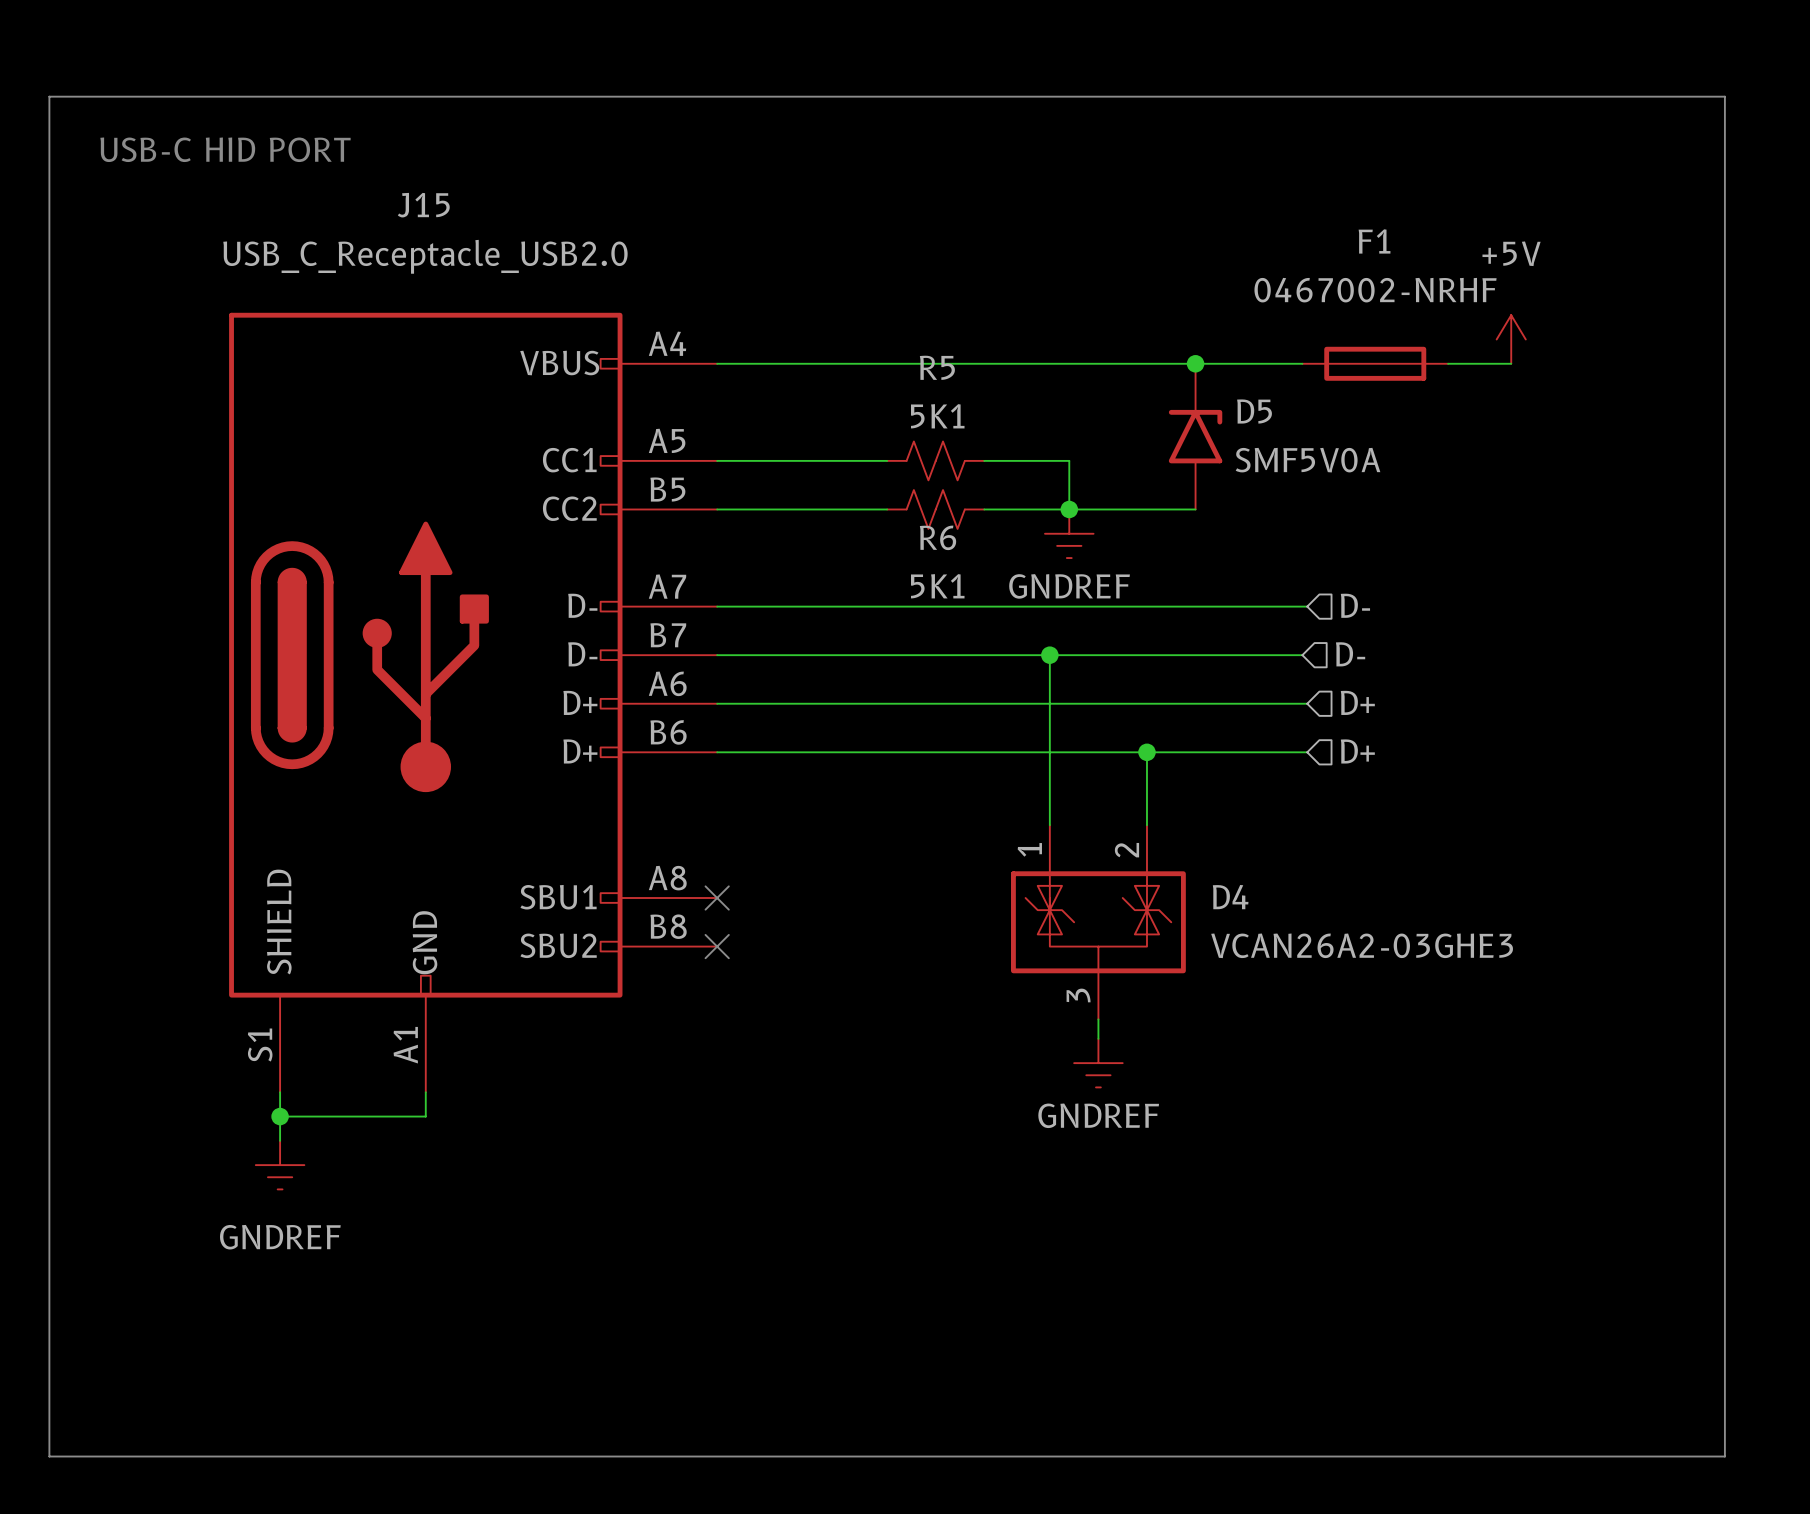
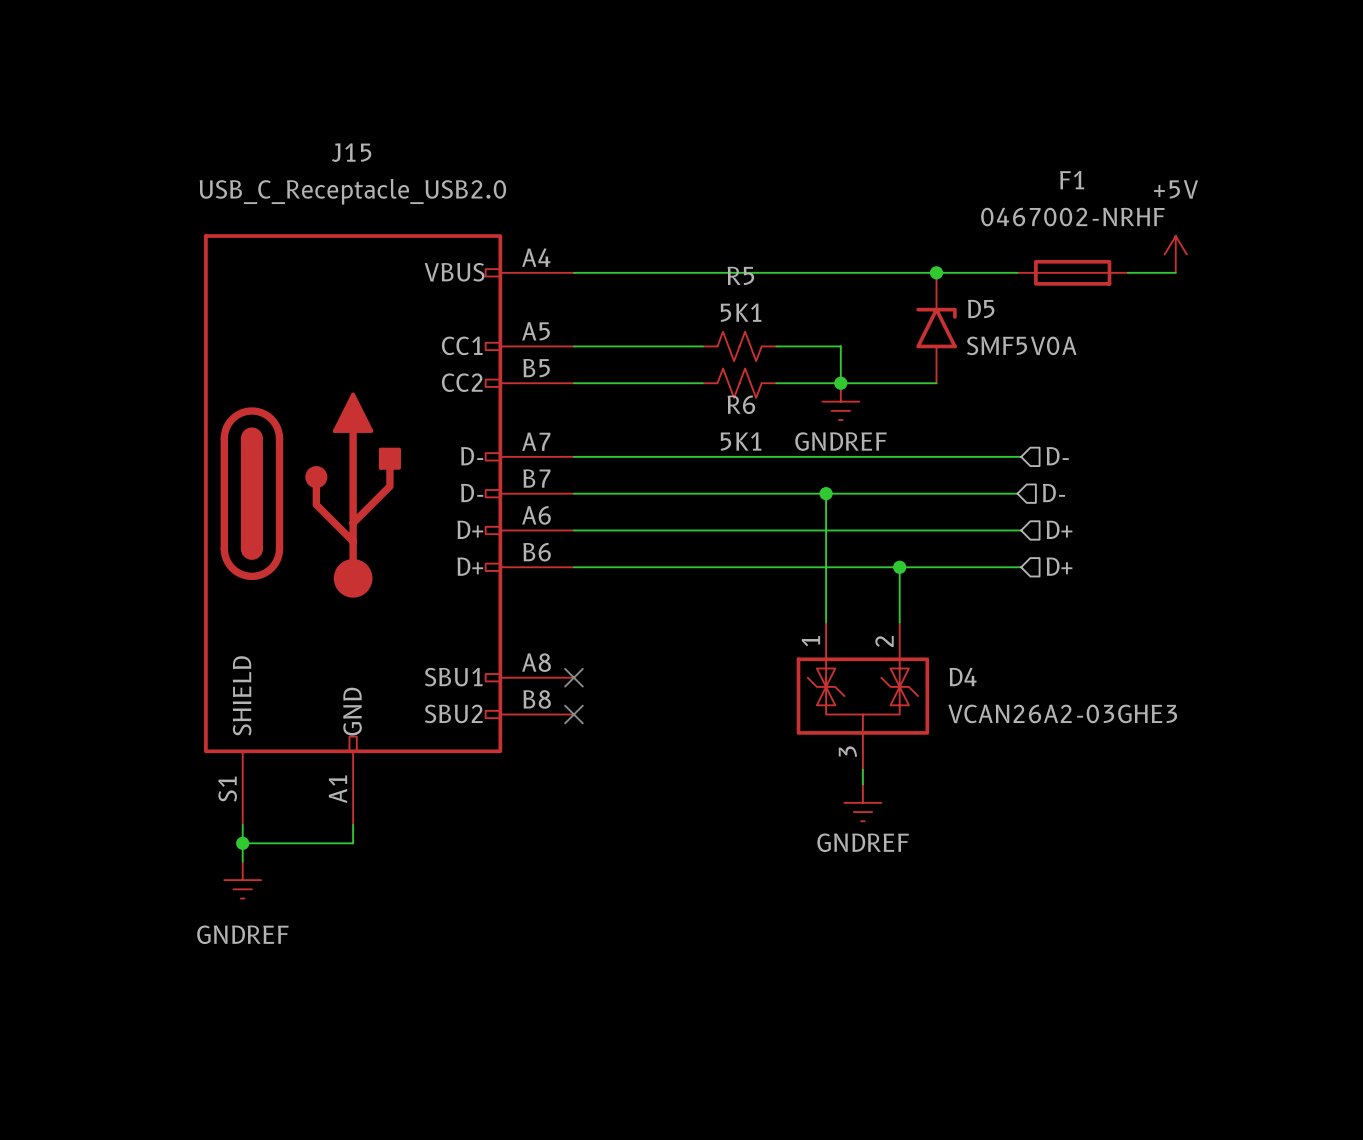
line: (49, 96) (49, 1456) (1724, 1456) (1724, 96) (49, 96) -> none
text: USB-C HID PORT (225, 149) -> none

